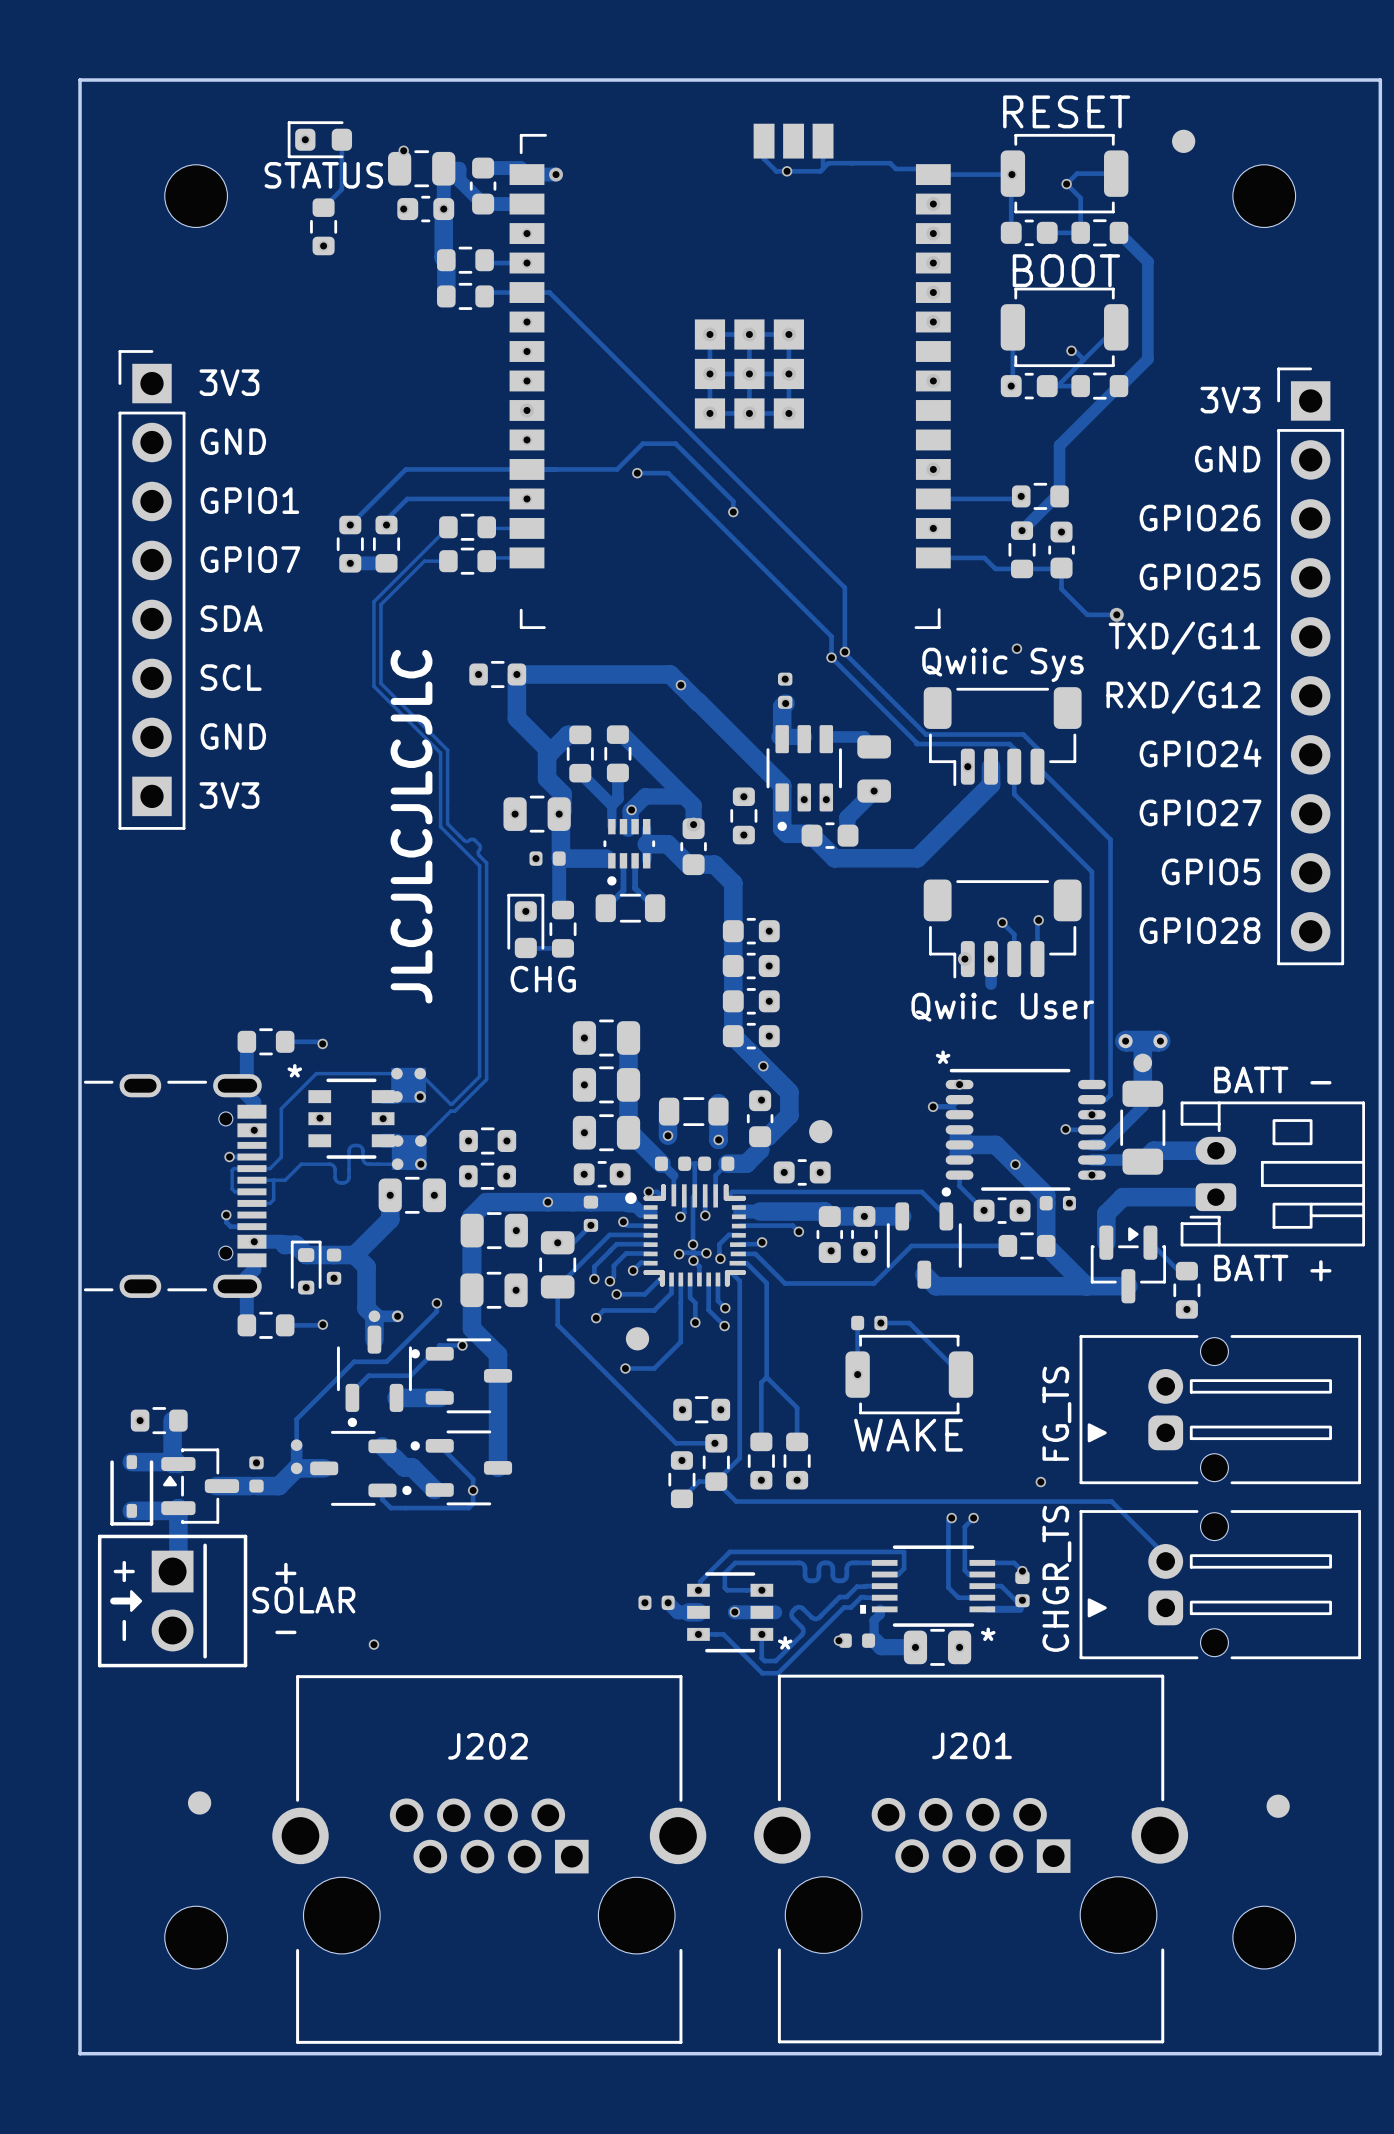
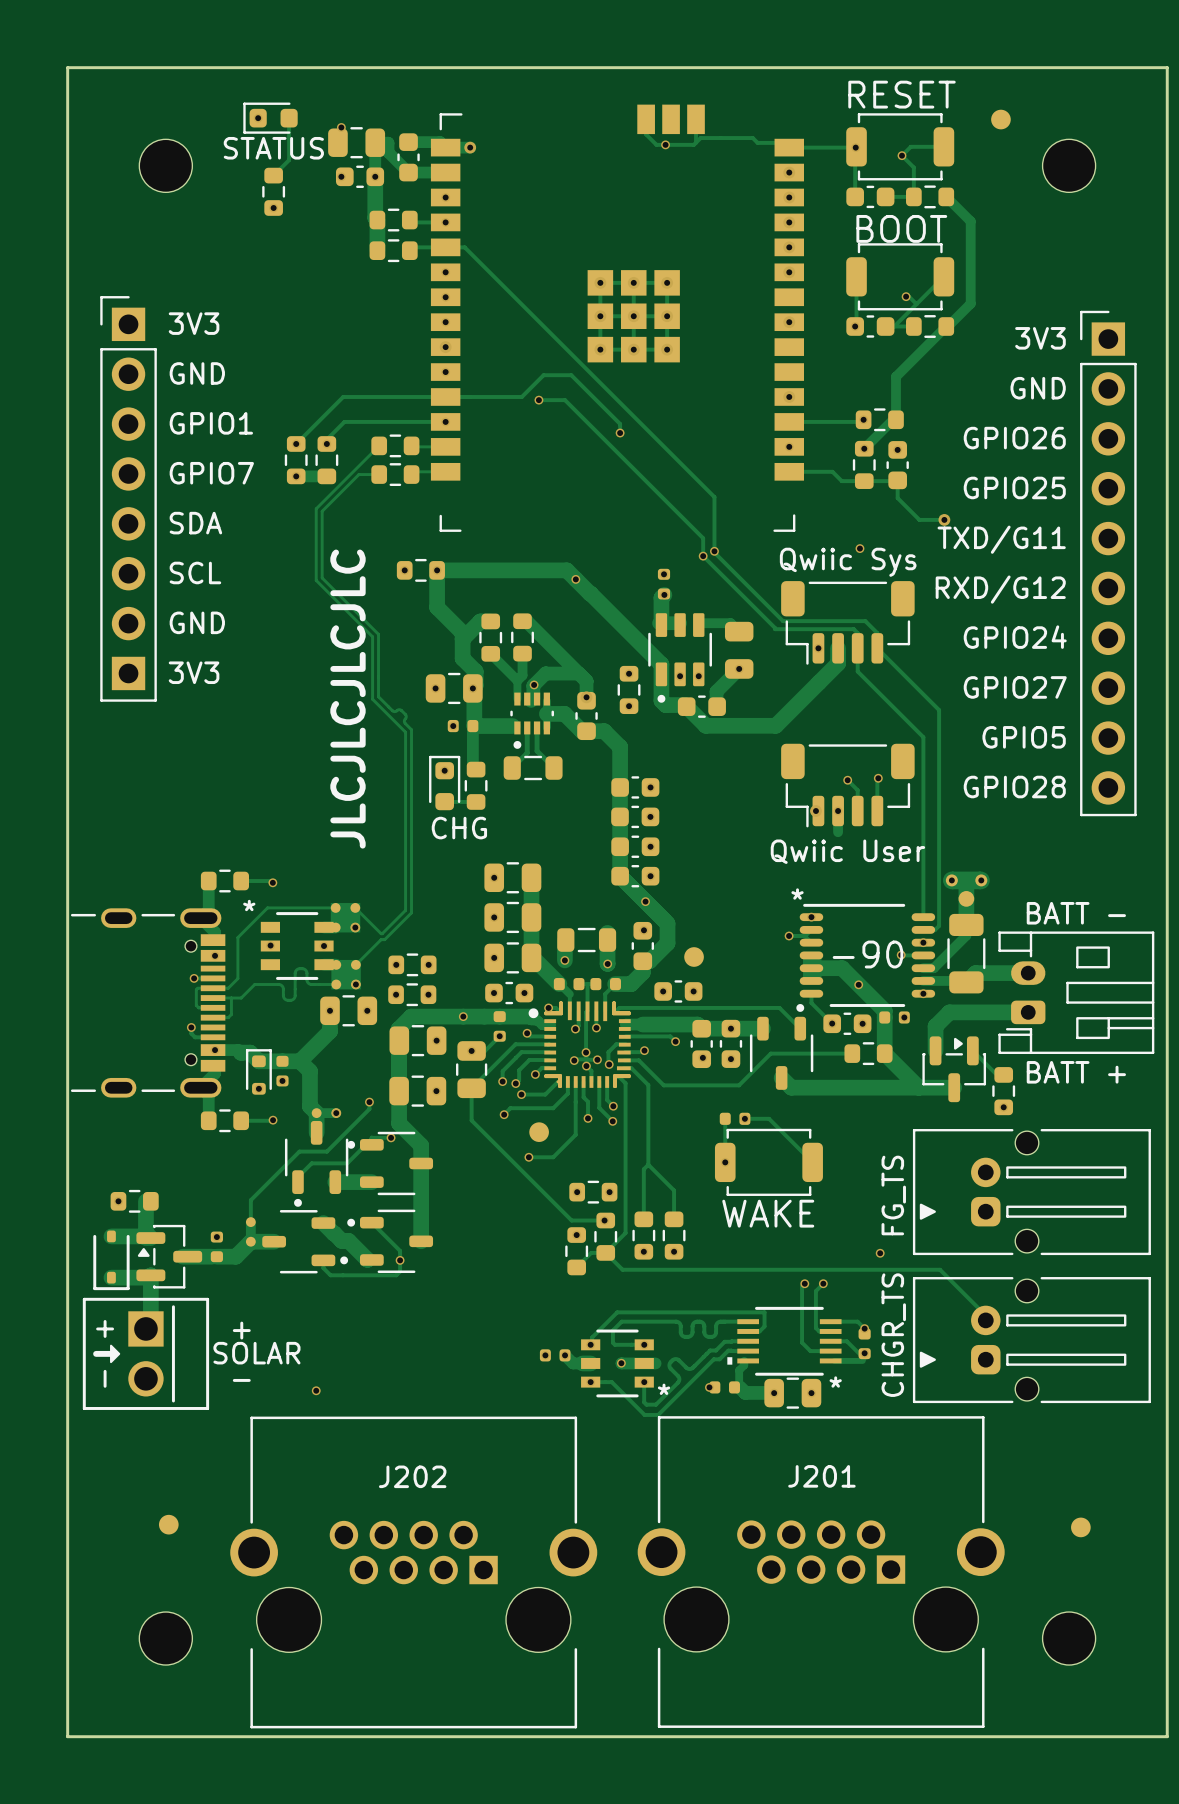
part text: none -> -90 (868, 954)

